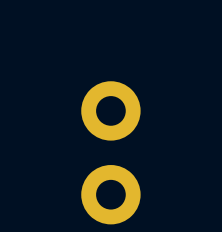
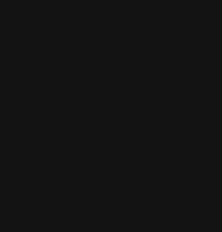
part: (110, 152) -> none

